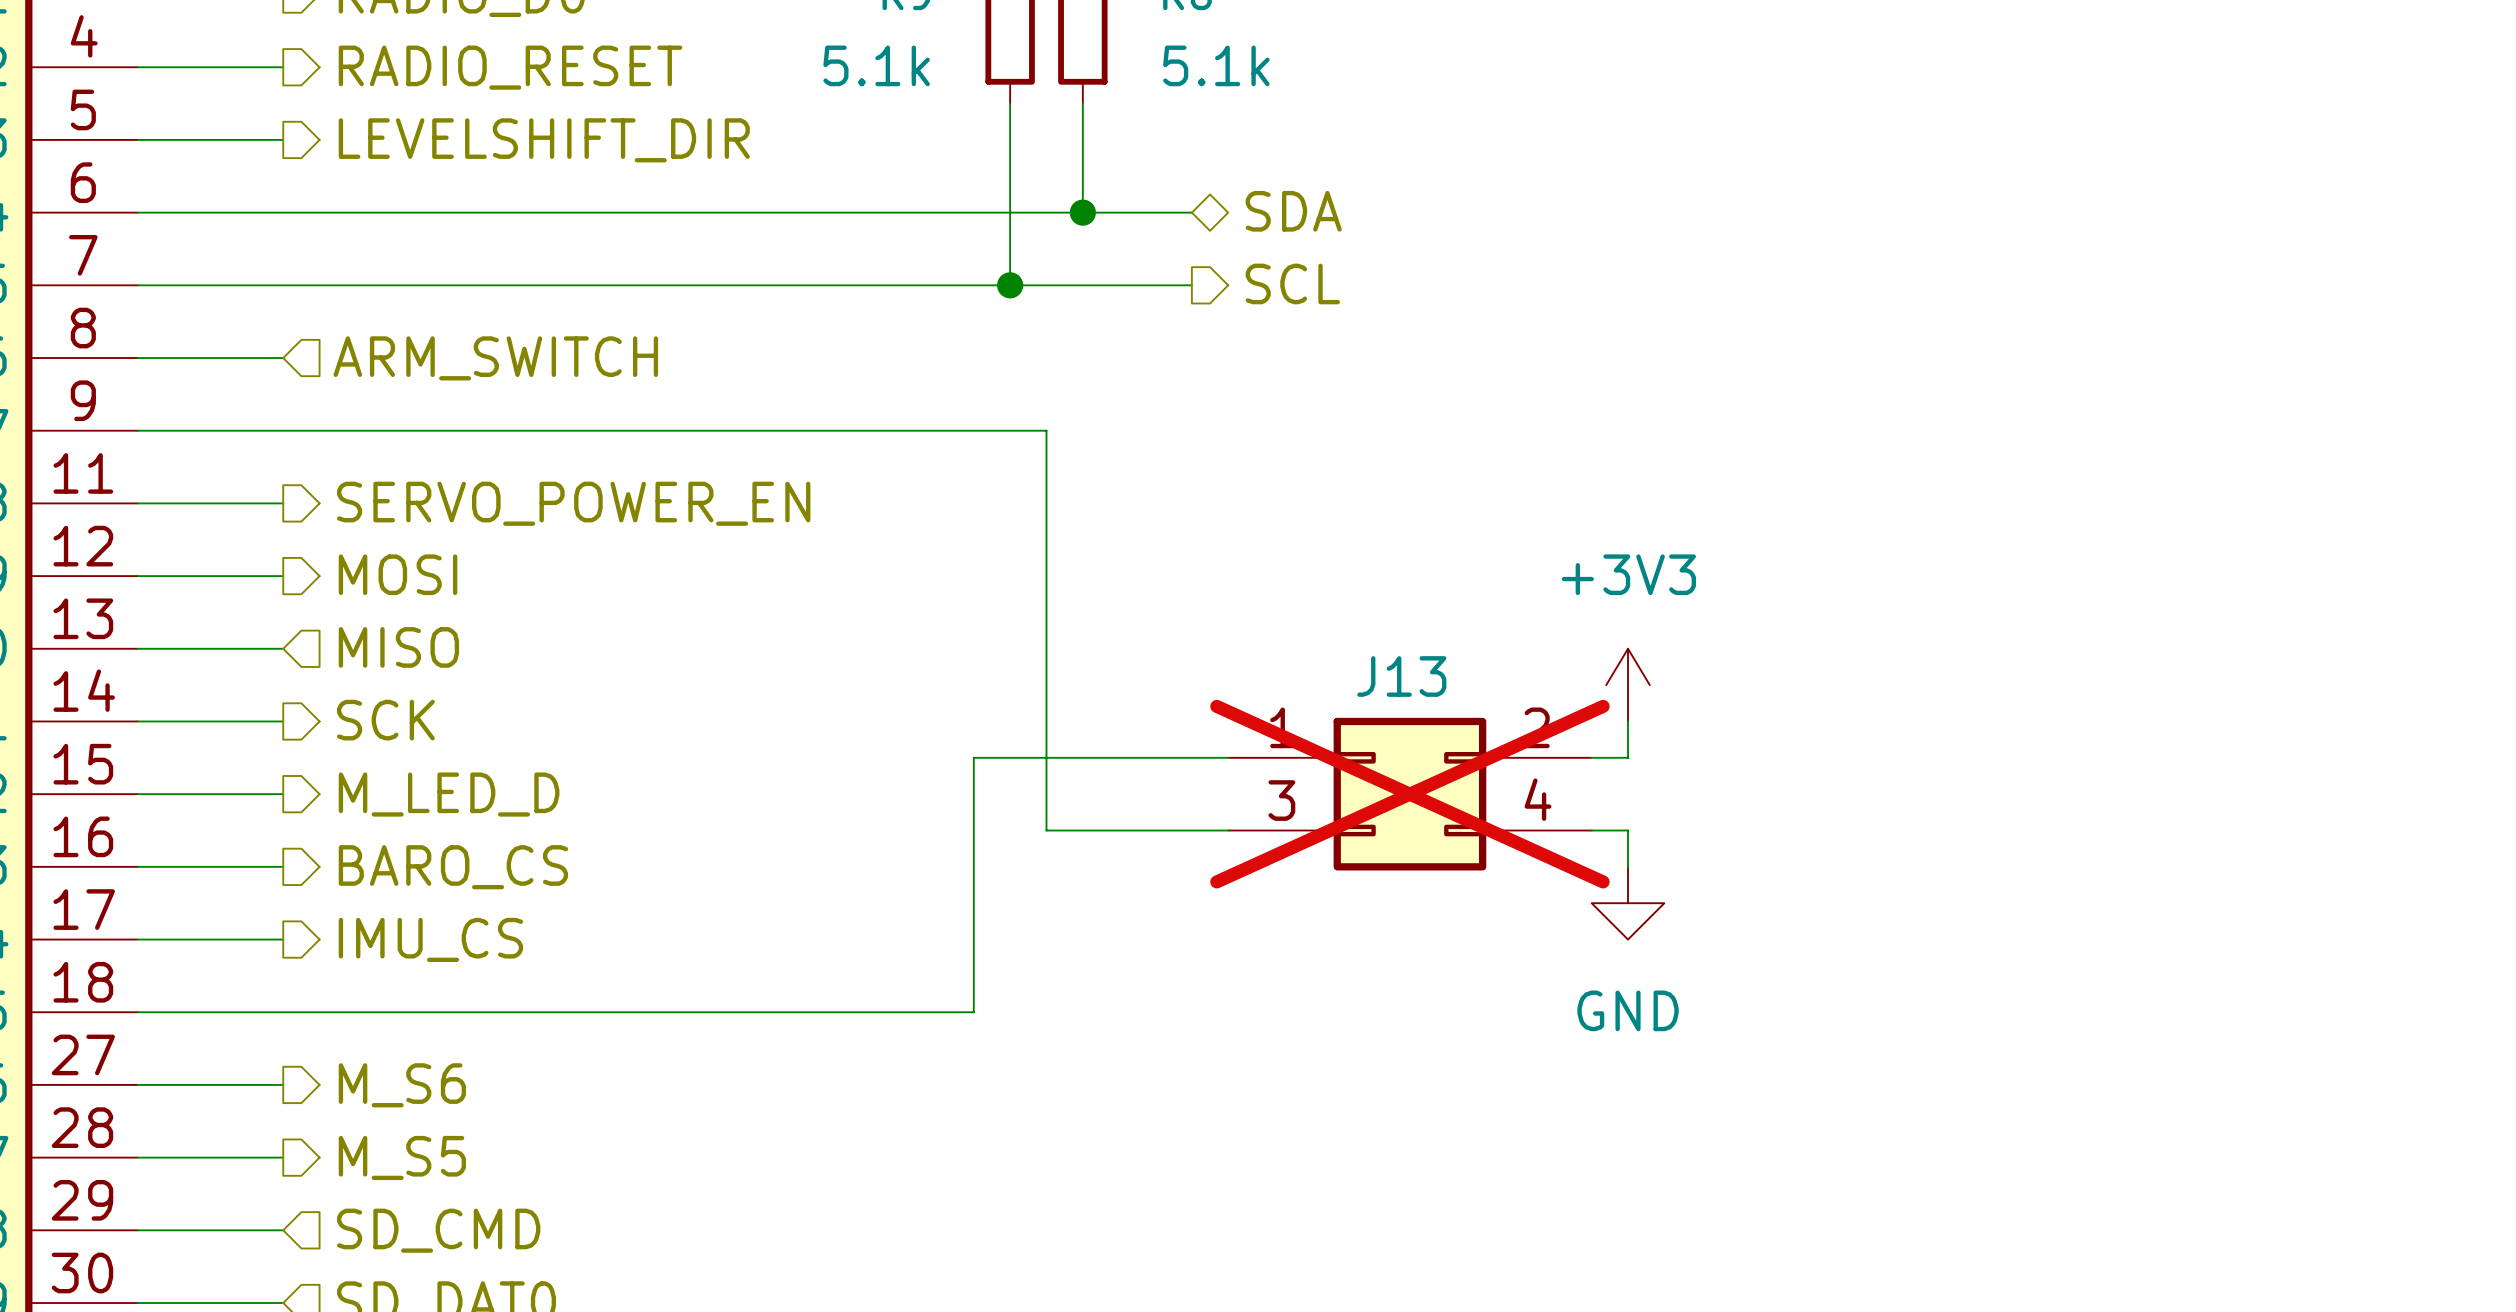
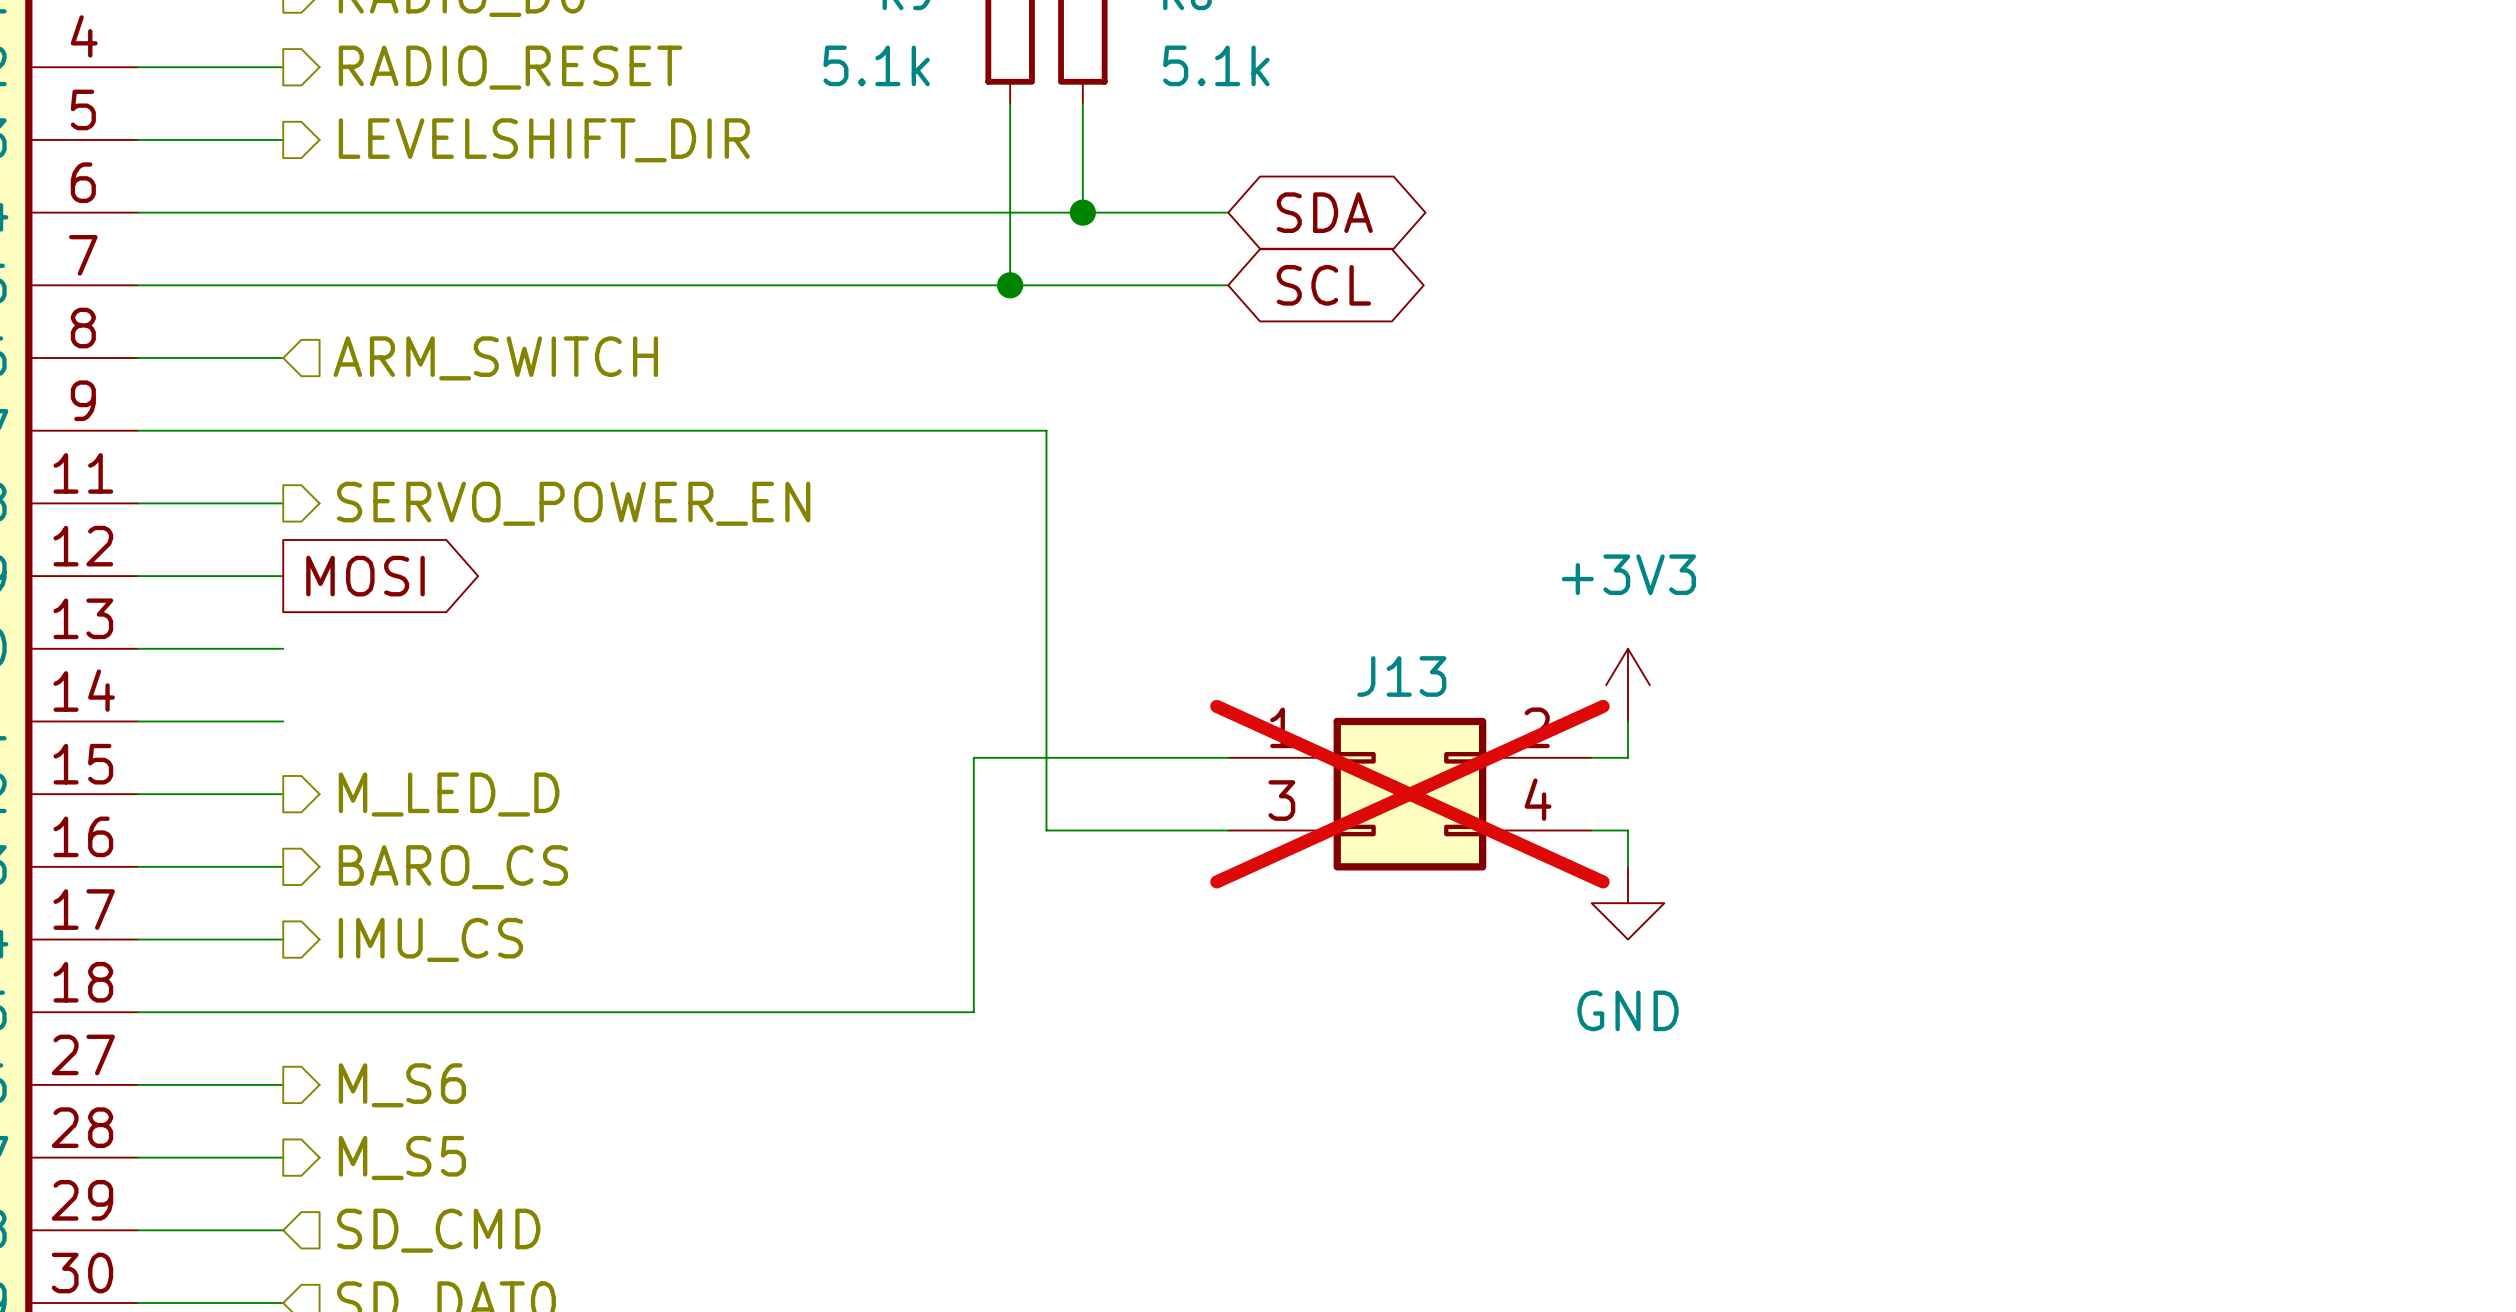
hierarchical label: SDA (1293, 211) -> none
wire: none -> (1191, 212) (1228, 212)
global label: none -> SDA (1324, 212)
hierarchical label: SCL (1292, 283) -> none
wire: none -> (1191, 285) (1228, 285)
global label: none -> SCL (1323, 285)
hierarchical label: MOSI (398, 574) -> none
global label: none -> MOSI (365, 576)
hierarchical label: MISO (398, 647) -> none
hierarchical label: SCK (385, 720) -> none

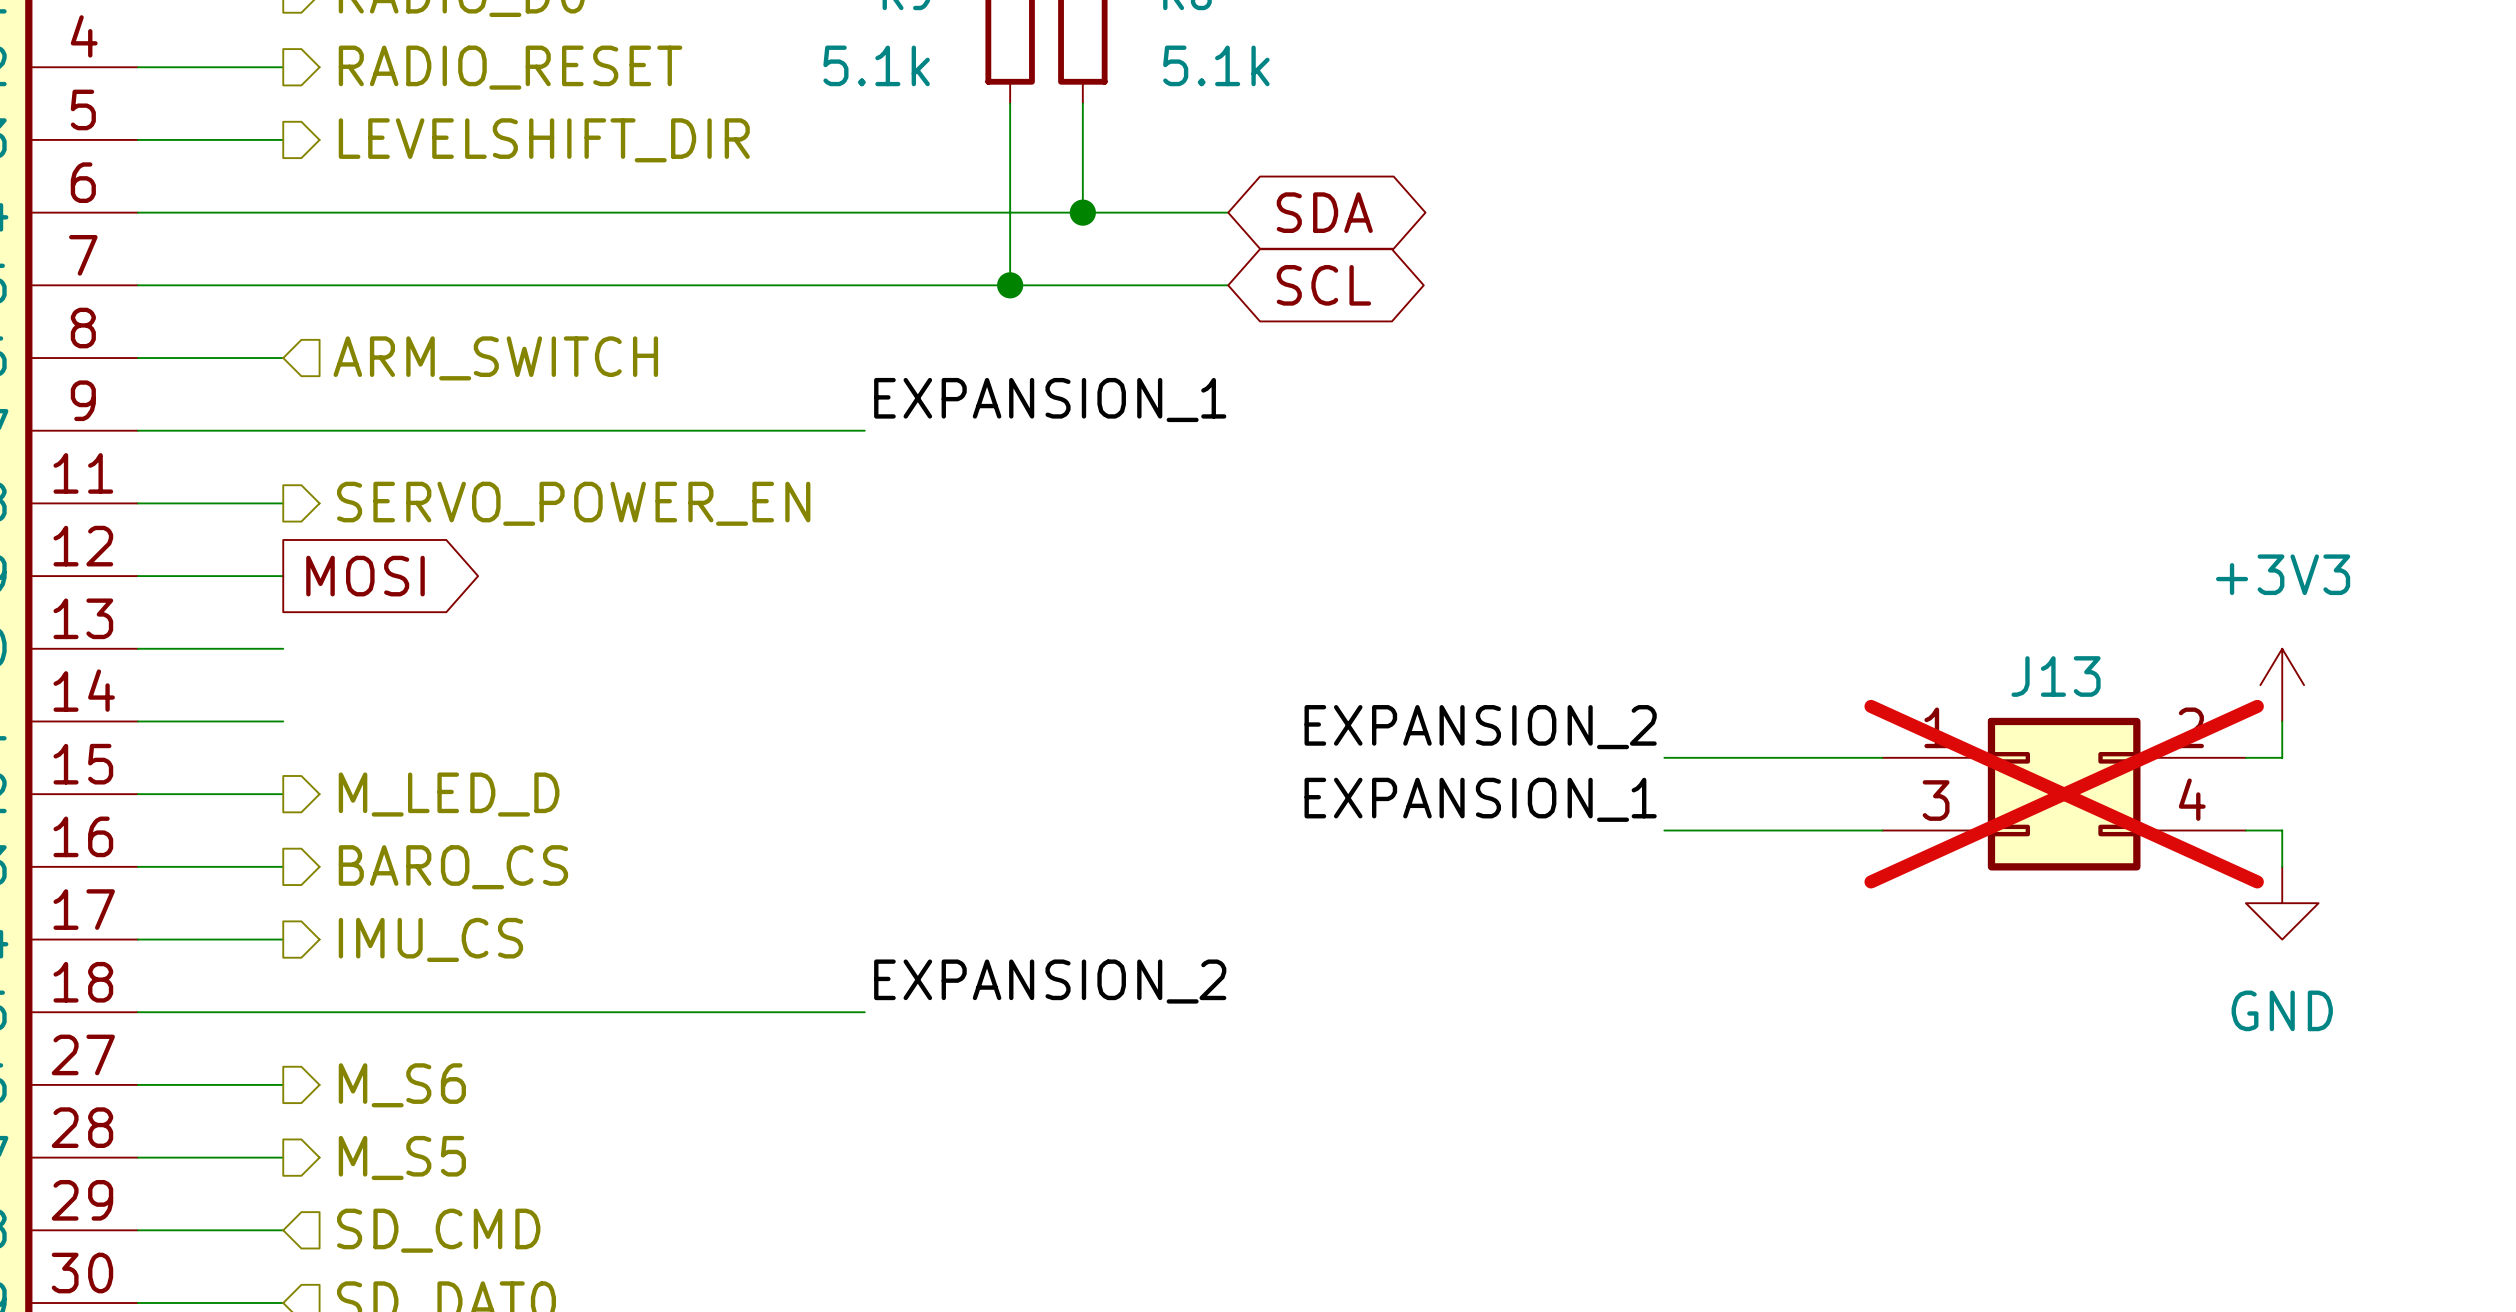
label: none -> EXPANSION_1 (1050, 400)
wire: (864, 430) (1046, 430) (1046, 830) (1228, 830) -> none
power symbol position: +3V3 (1628, 685) -> +3V3 (2282, 685)
wire: (1628, 721) (1628, 757) (1591, 757) -> (2282, 721) (2282, 757) (2245, 757)
label: none -> EXPANSION_2 (1480, 727)
wire: (1228, 757) (973, 757) (973, 1012) (864, 1012) -> none
wire: none -> (1664, 757) (1882, 757)
J13 position: (1409, 794) -> (2064, 794)
label: none -> EXPANSION_1 (1480, 799)
wire: (1591, 830) (1628, 830) (1628, 866) -> (2245, 830) (2282, 830) (2282, 866)
wire: none -> (1664, 830) (1882, 830)
power symbol position: GND (1628, 903) -> GND (2282, 903)
label: none -> EXPANSION_2 (1050, 981)

